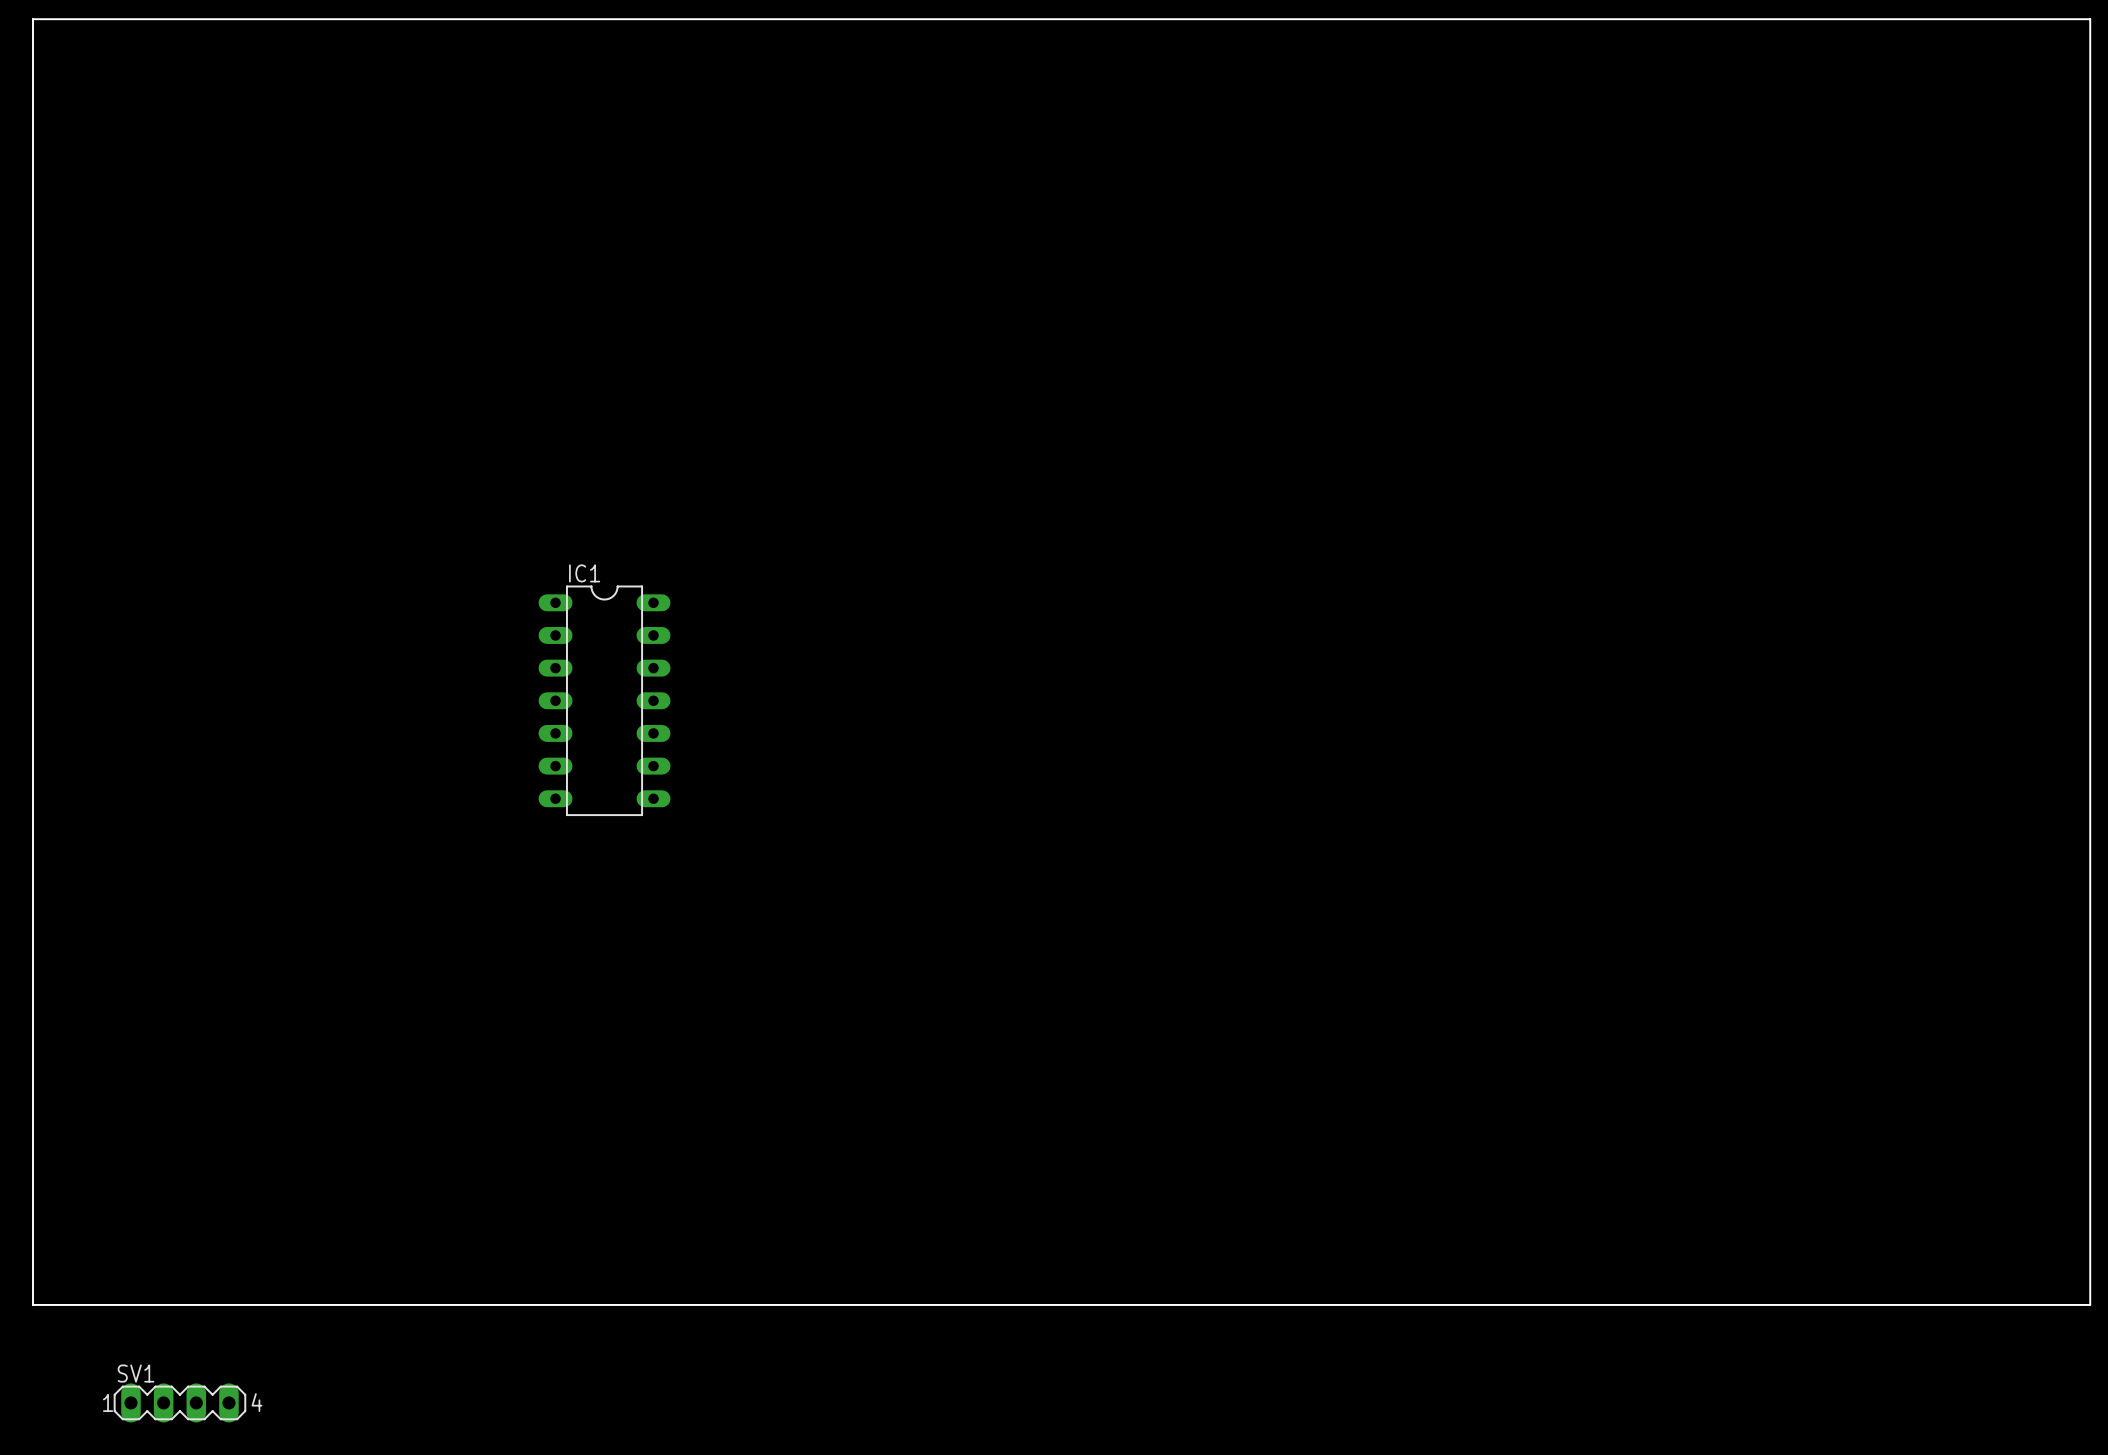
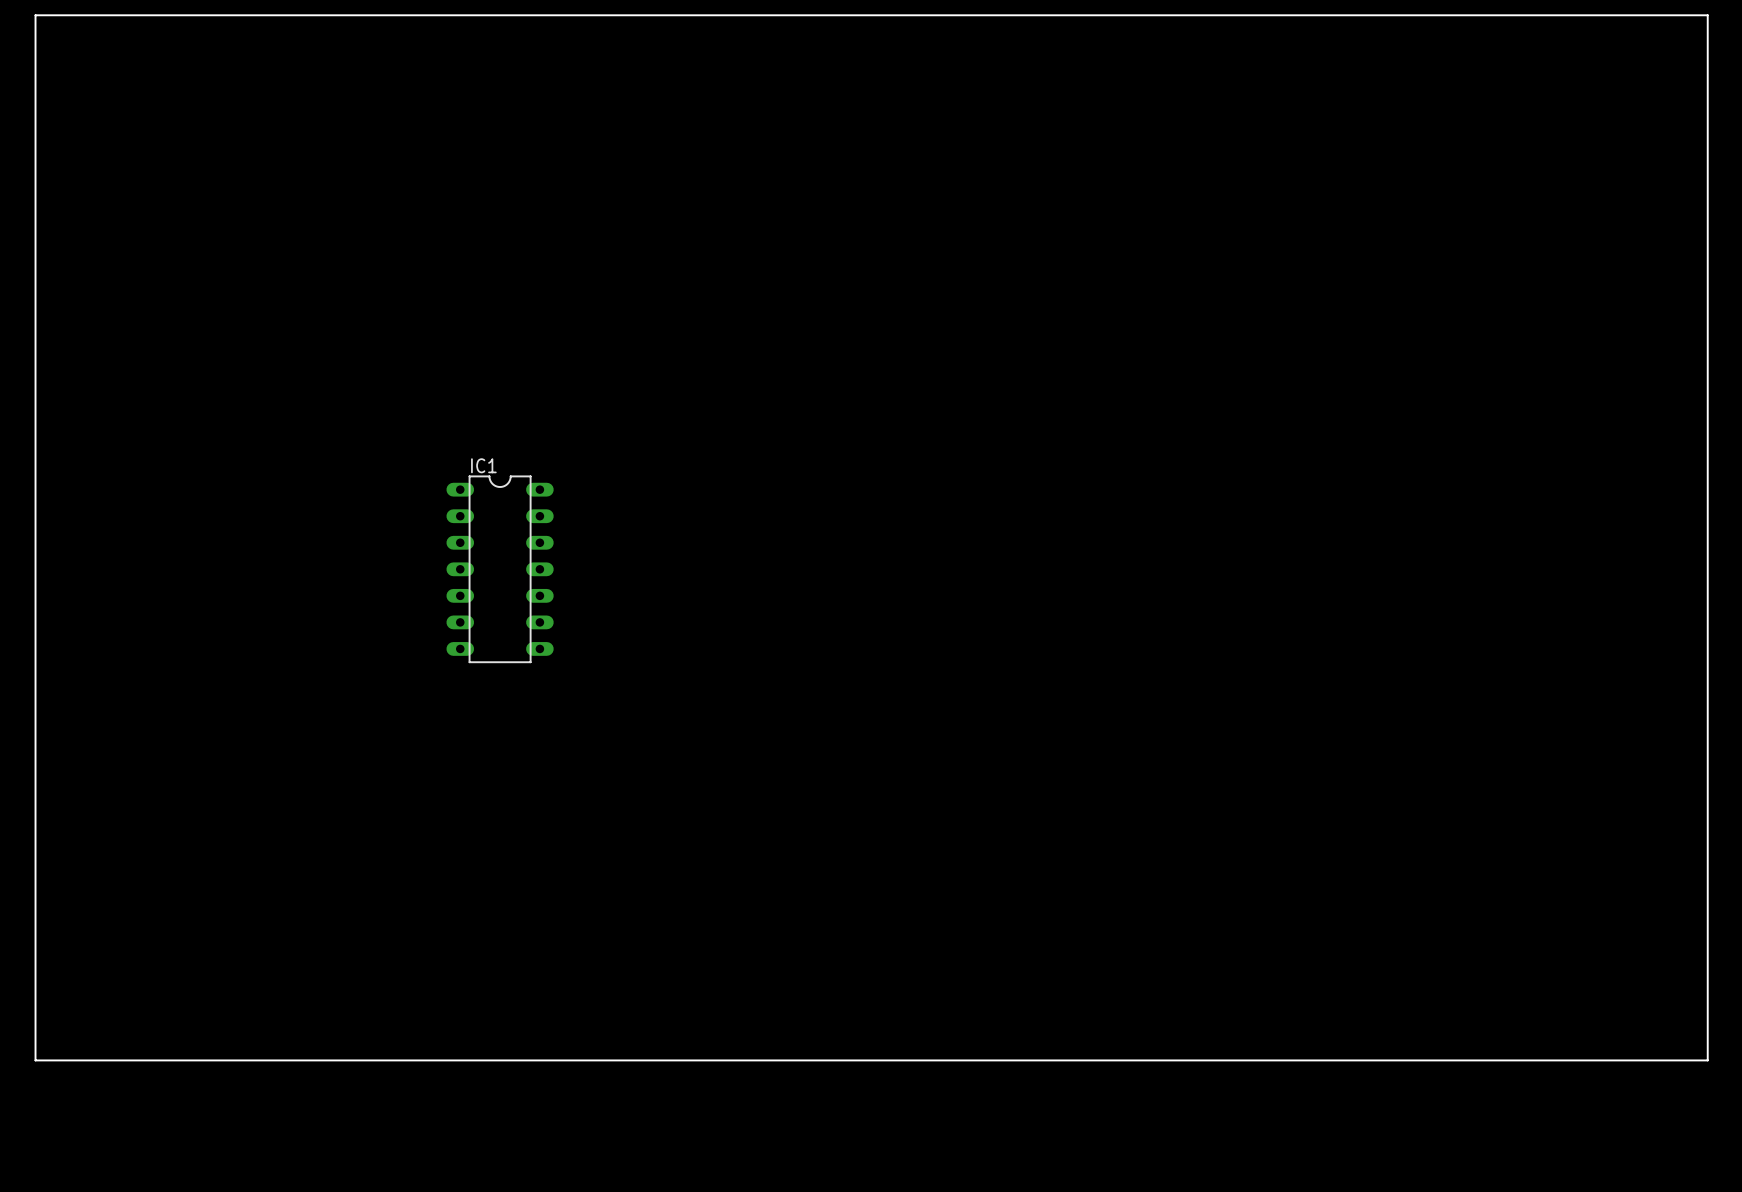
SV1: (179, 1402) -> none

